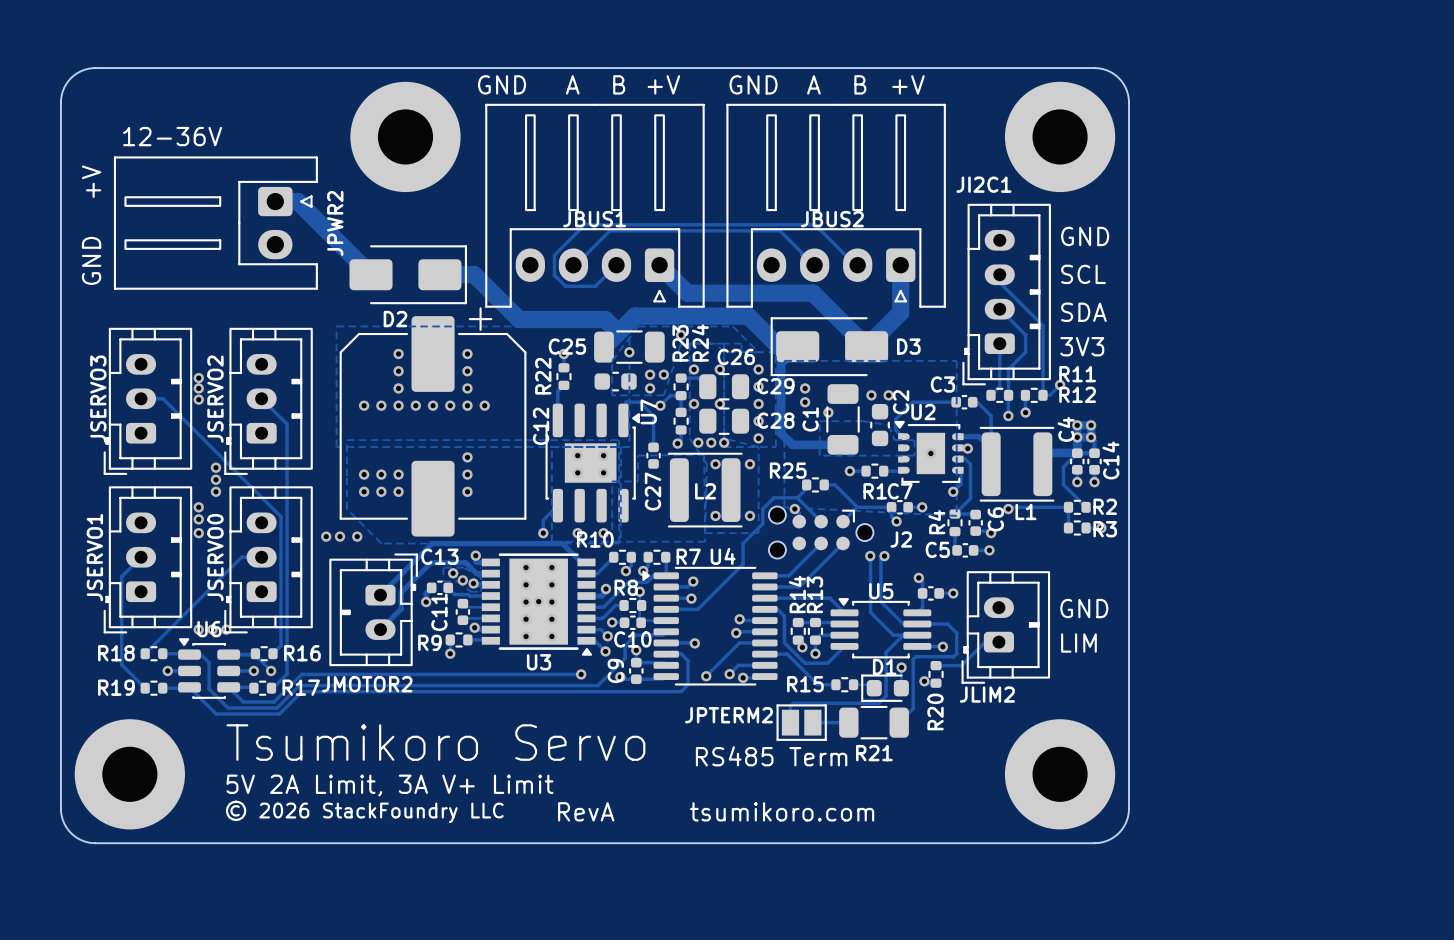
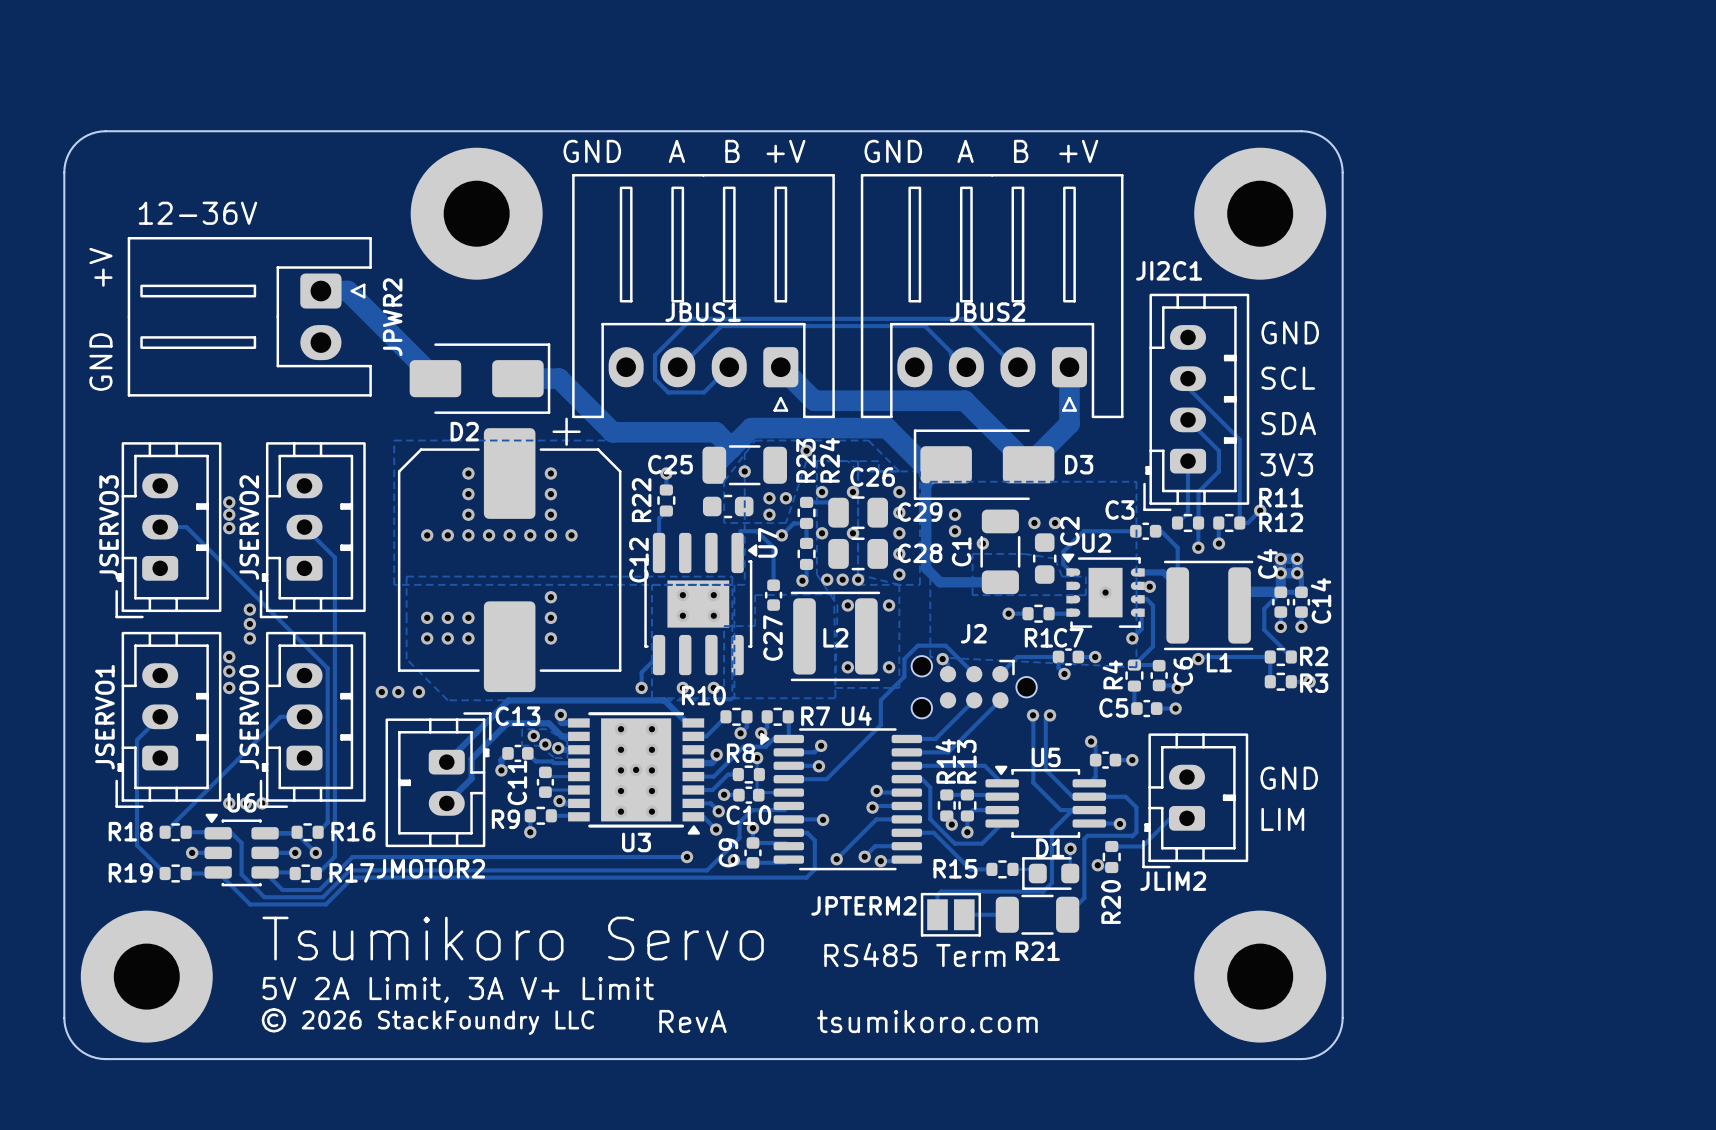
track: (806, 484) (806, 488) (797, 497) -> none
R25: (815, 484) -> none
track: (824, 484) (834, 484) (857, 507) -> none
J2 name position: J2 (901, 539) -> J2 (973, 633)

